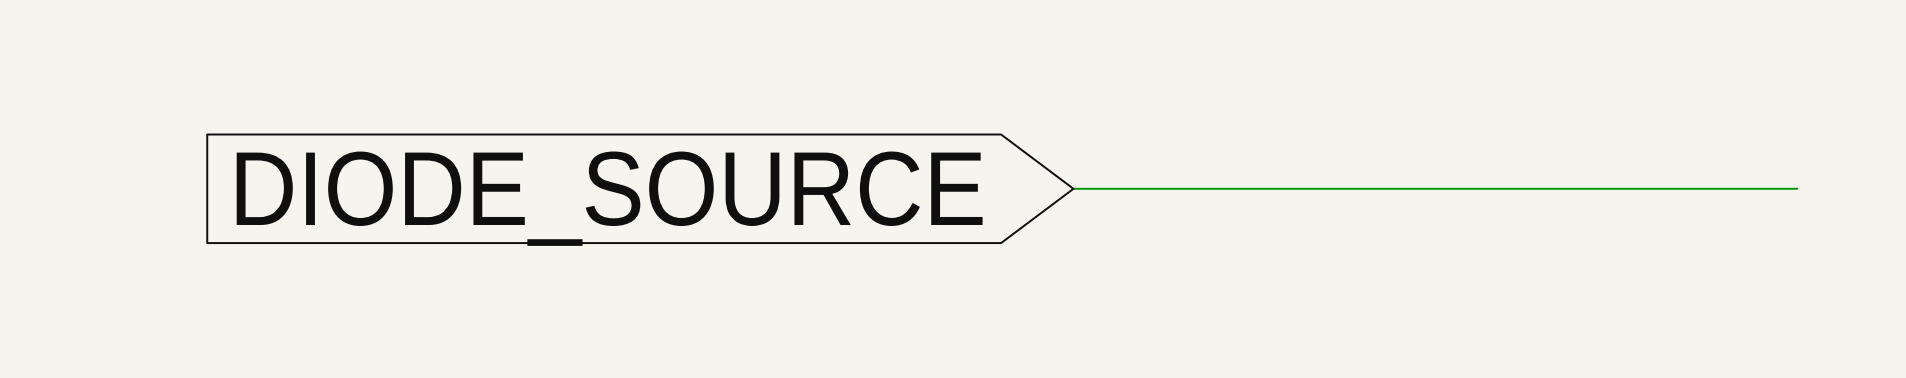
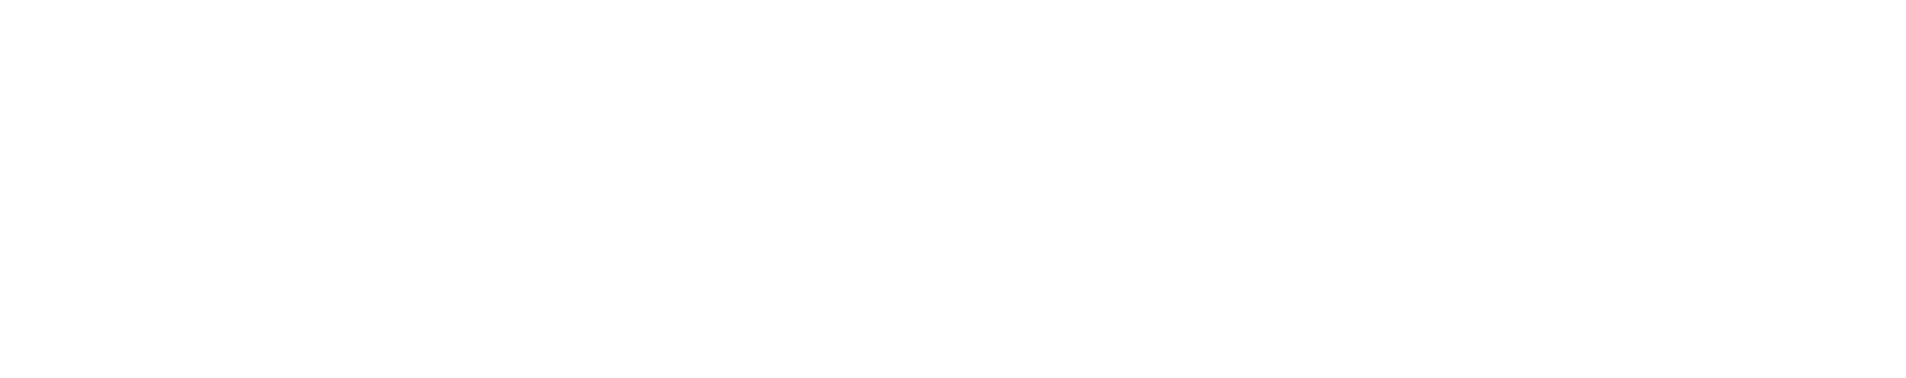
wire: (1073, 188) (1797, 188) -> none
global label: DIODE_SOURCE (609, 198) -> none

